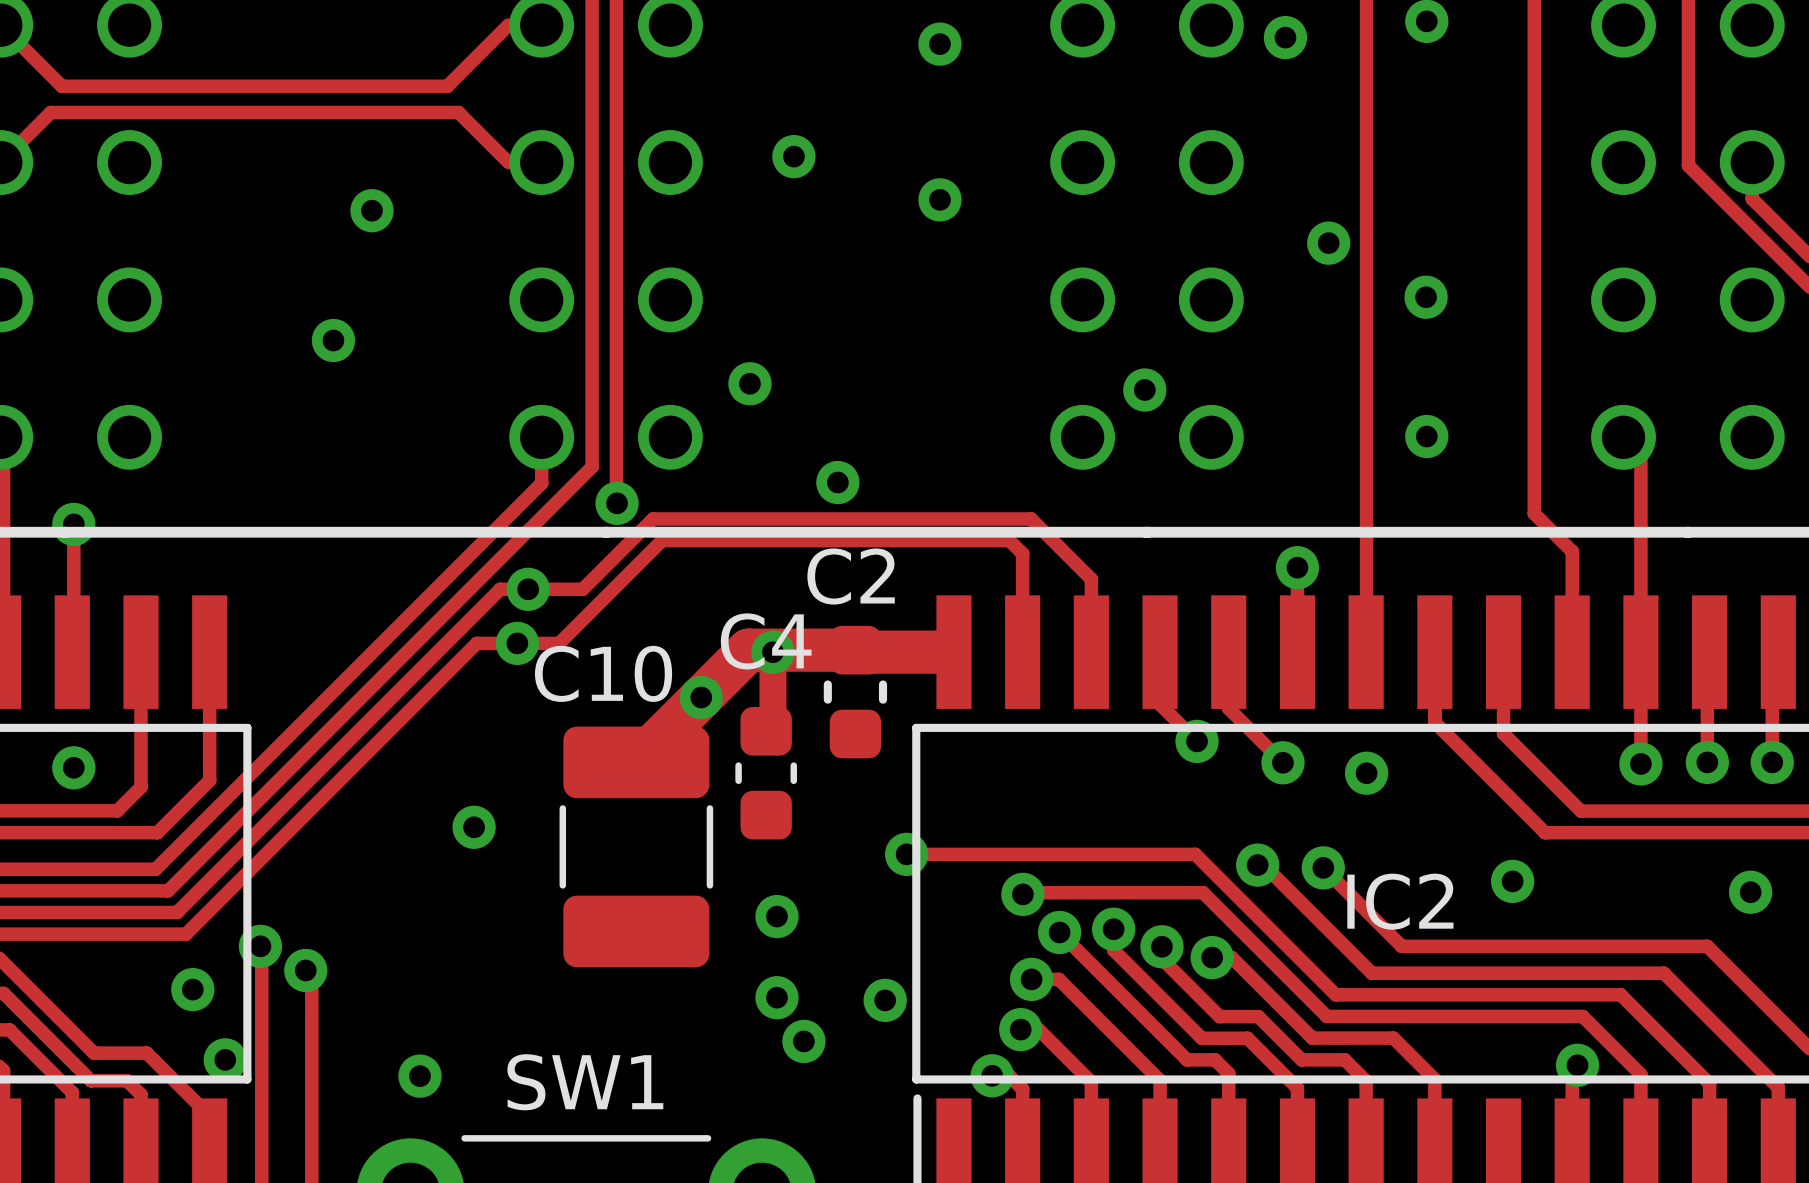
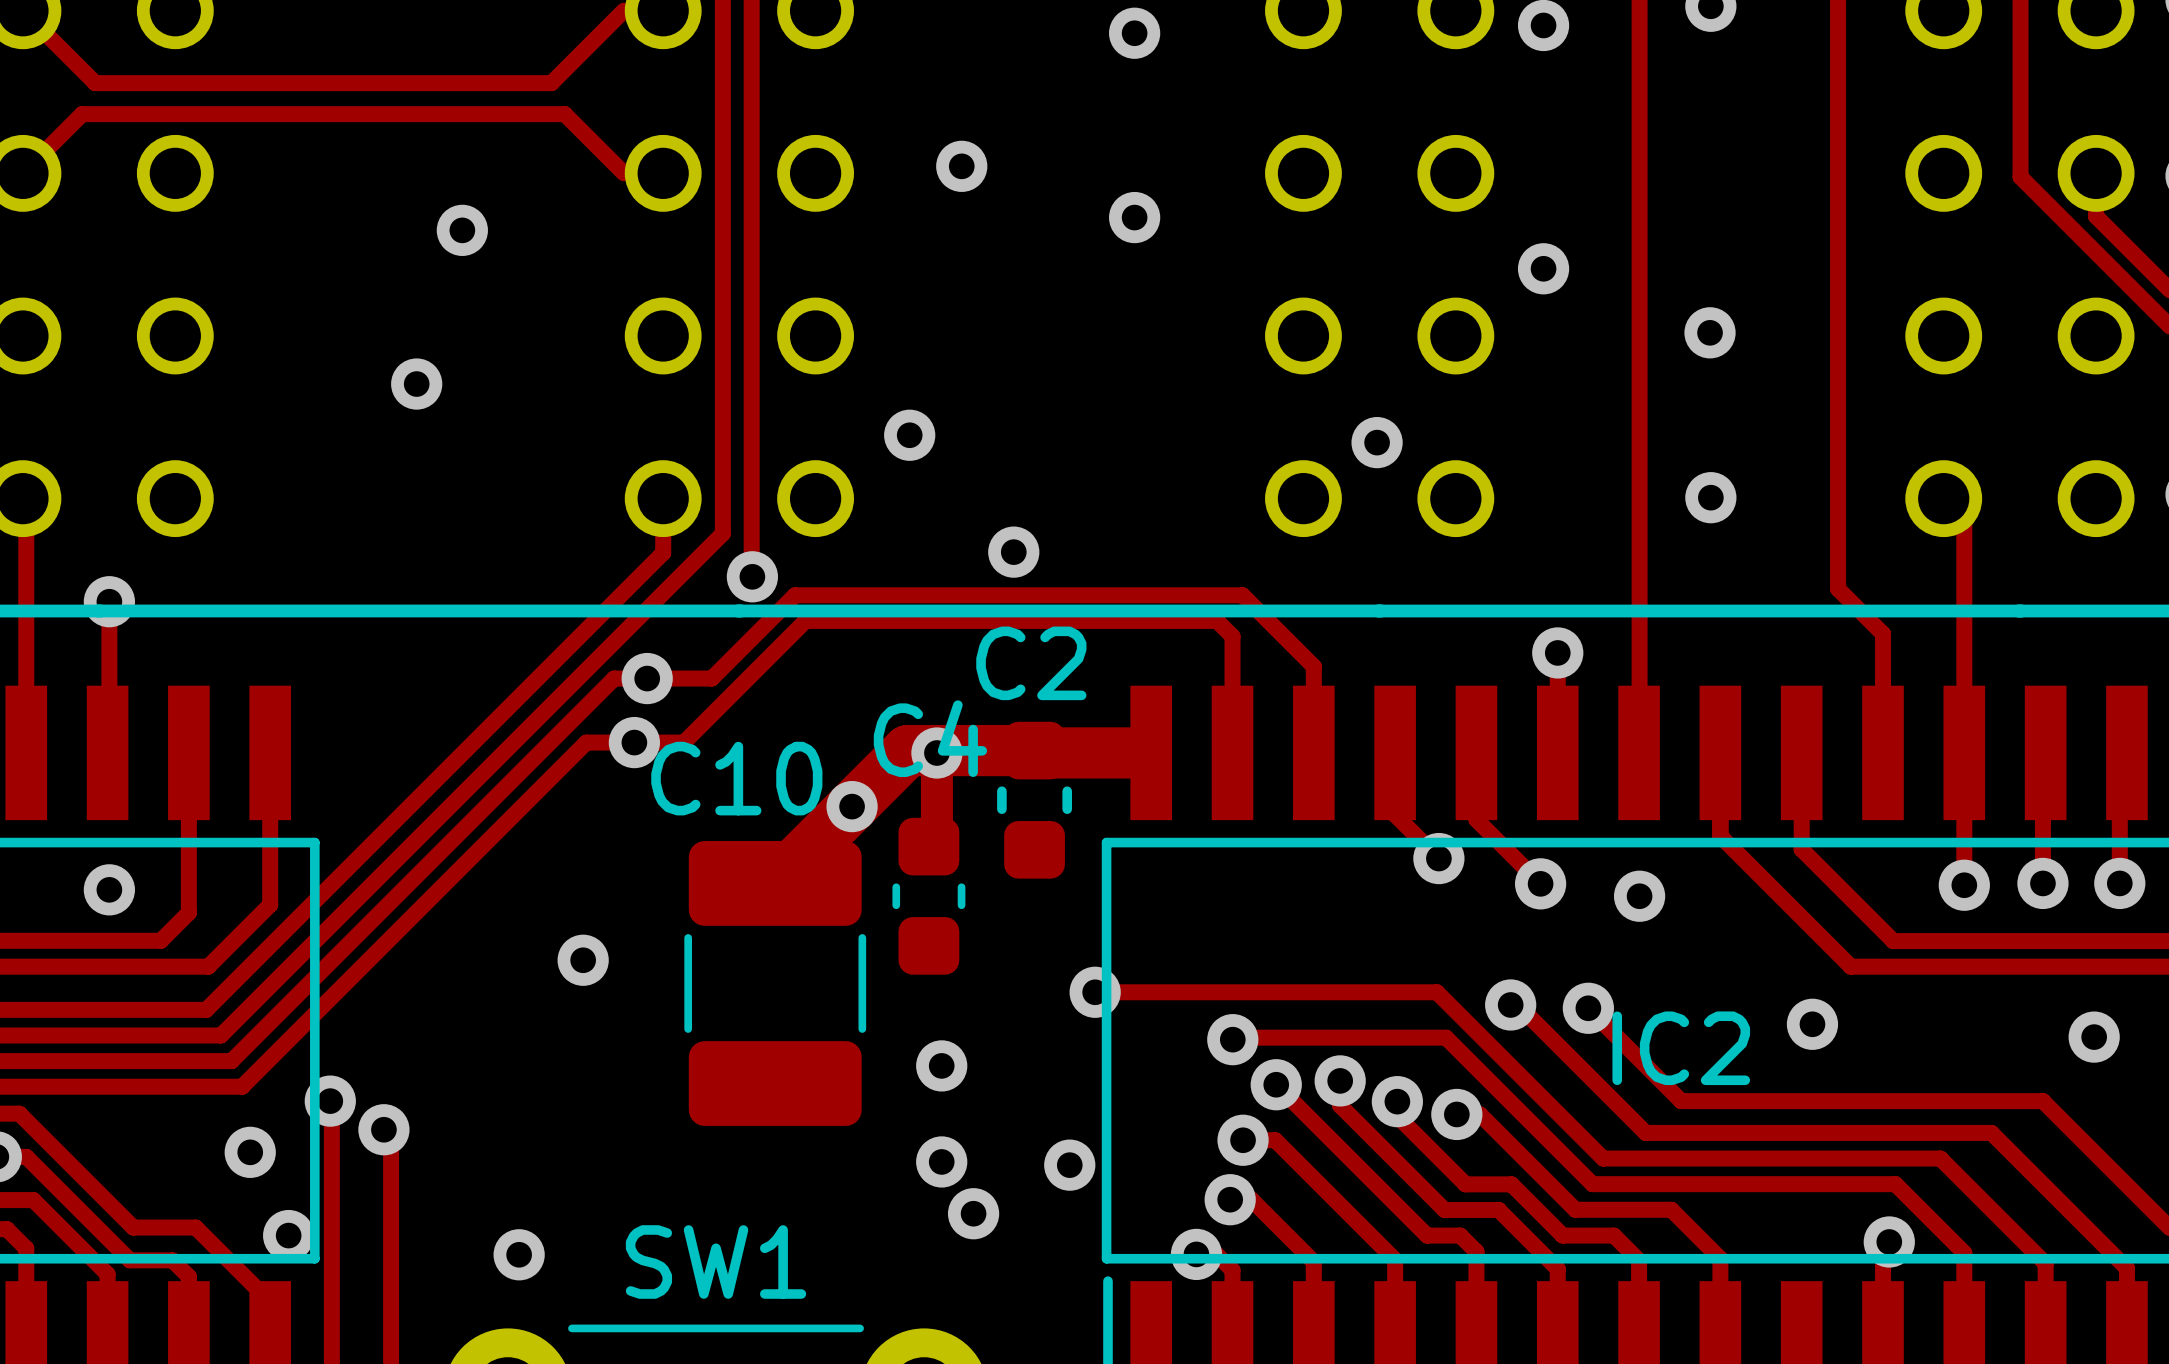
via position: (1328, 243) -> (1543, 268)

